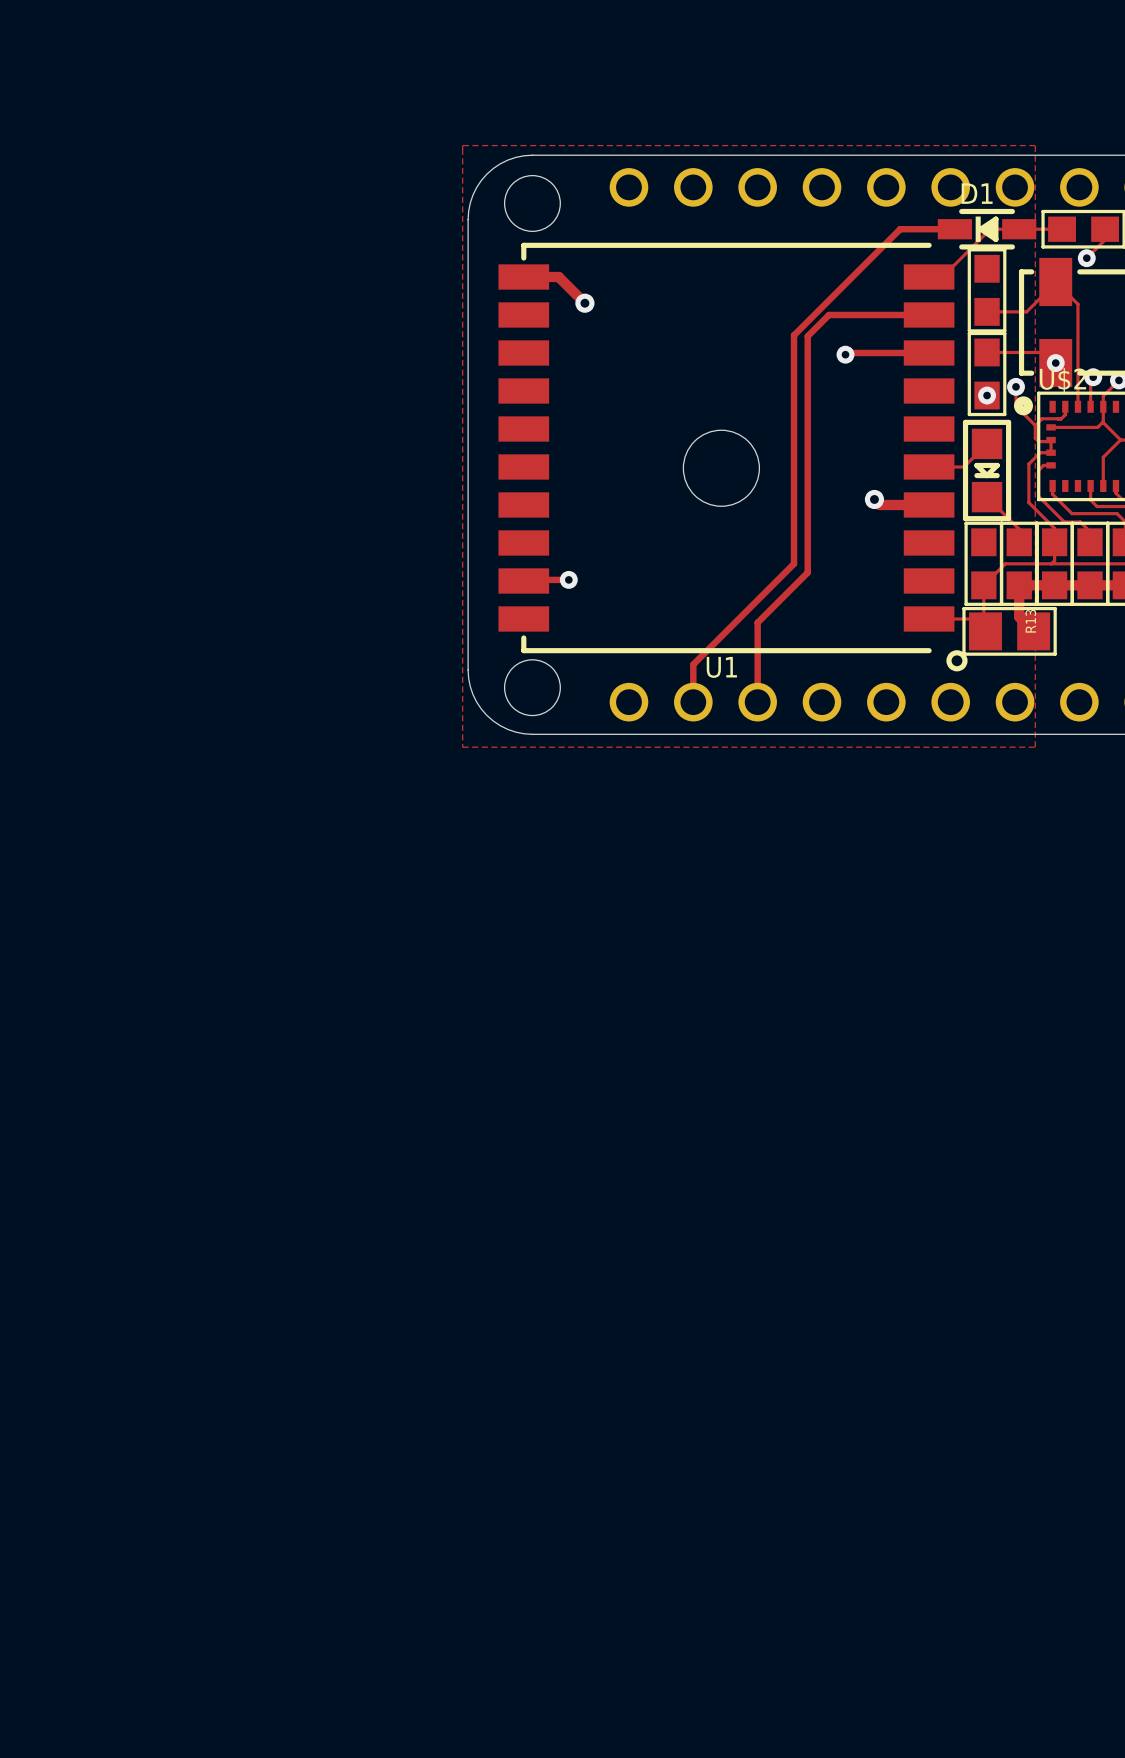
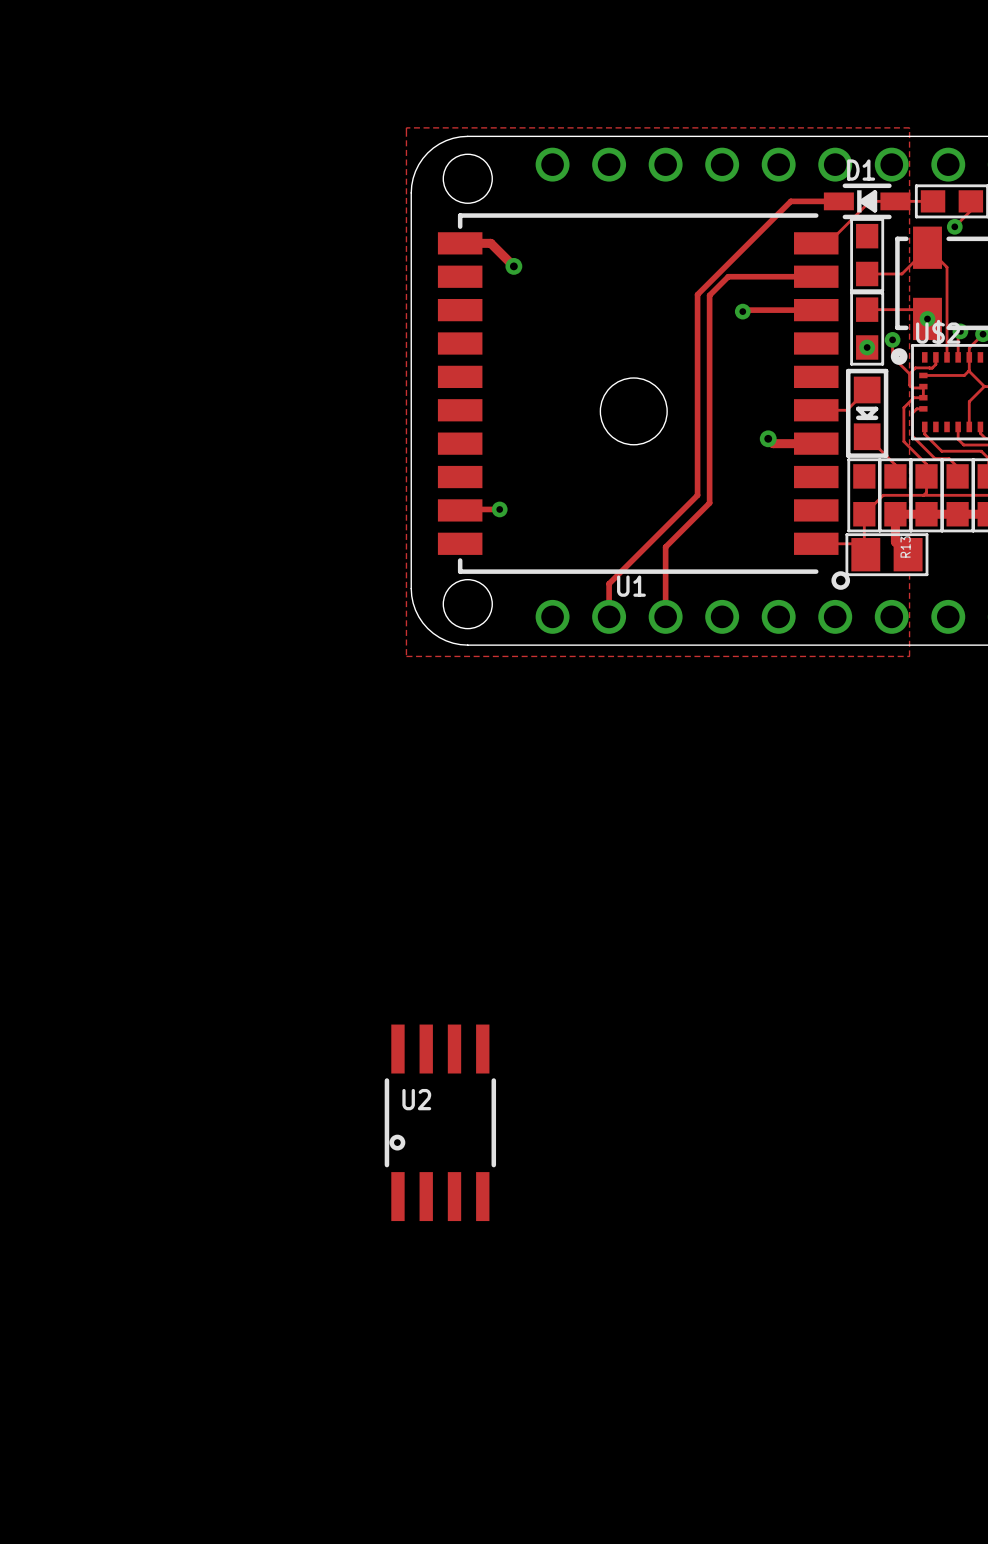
U2: none -> (440, 1122)

